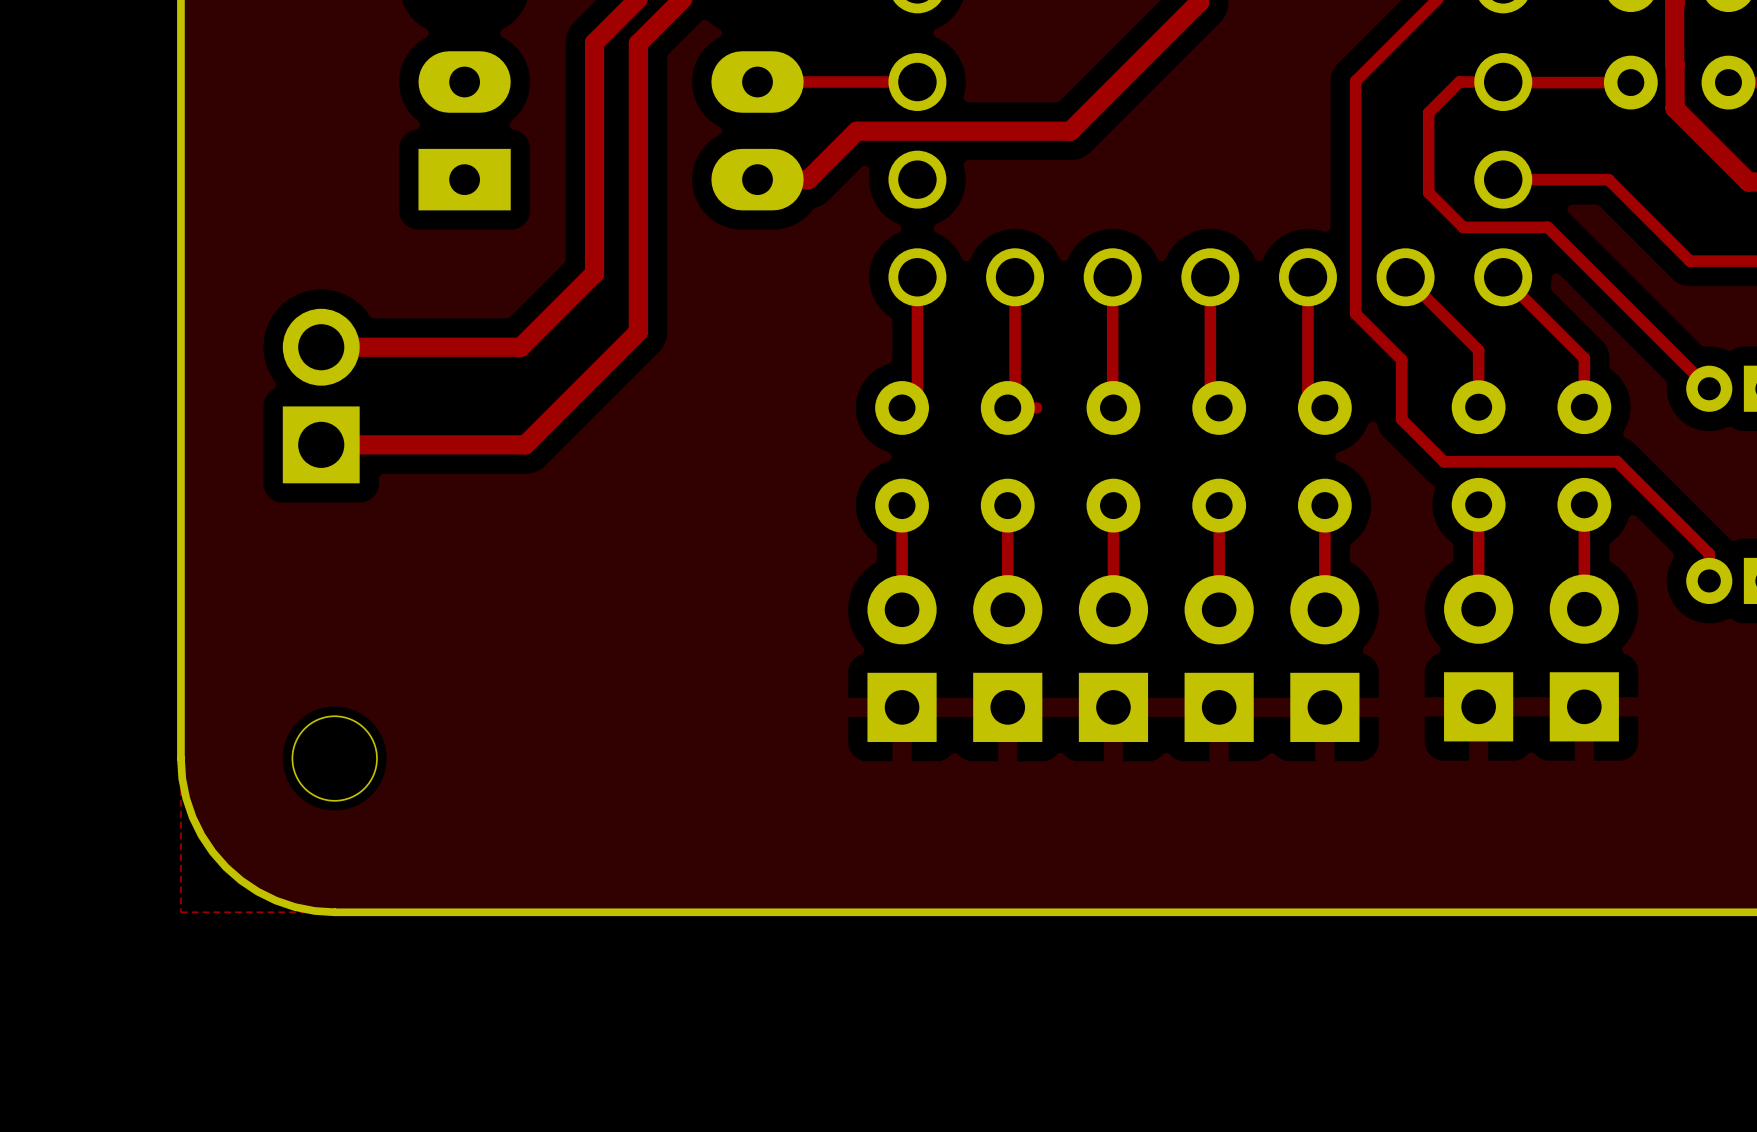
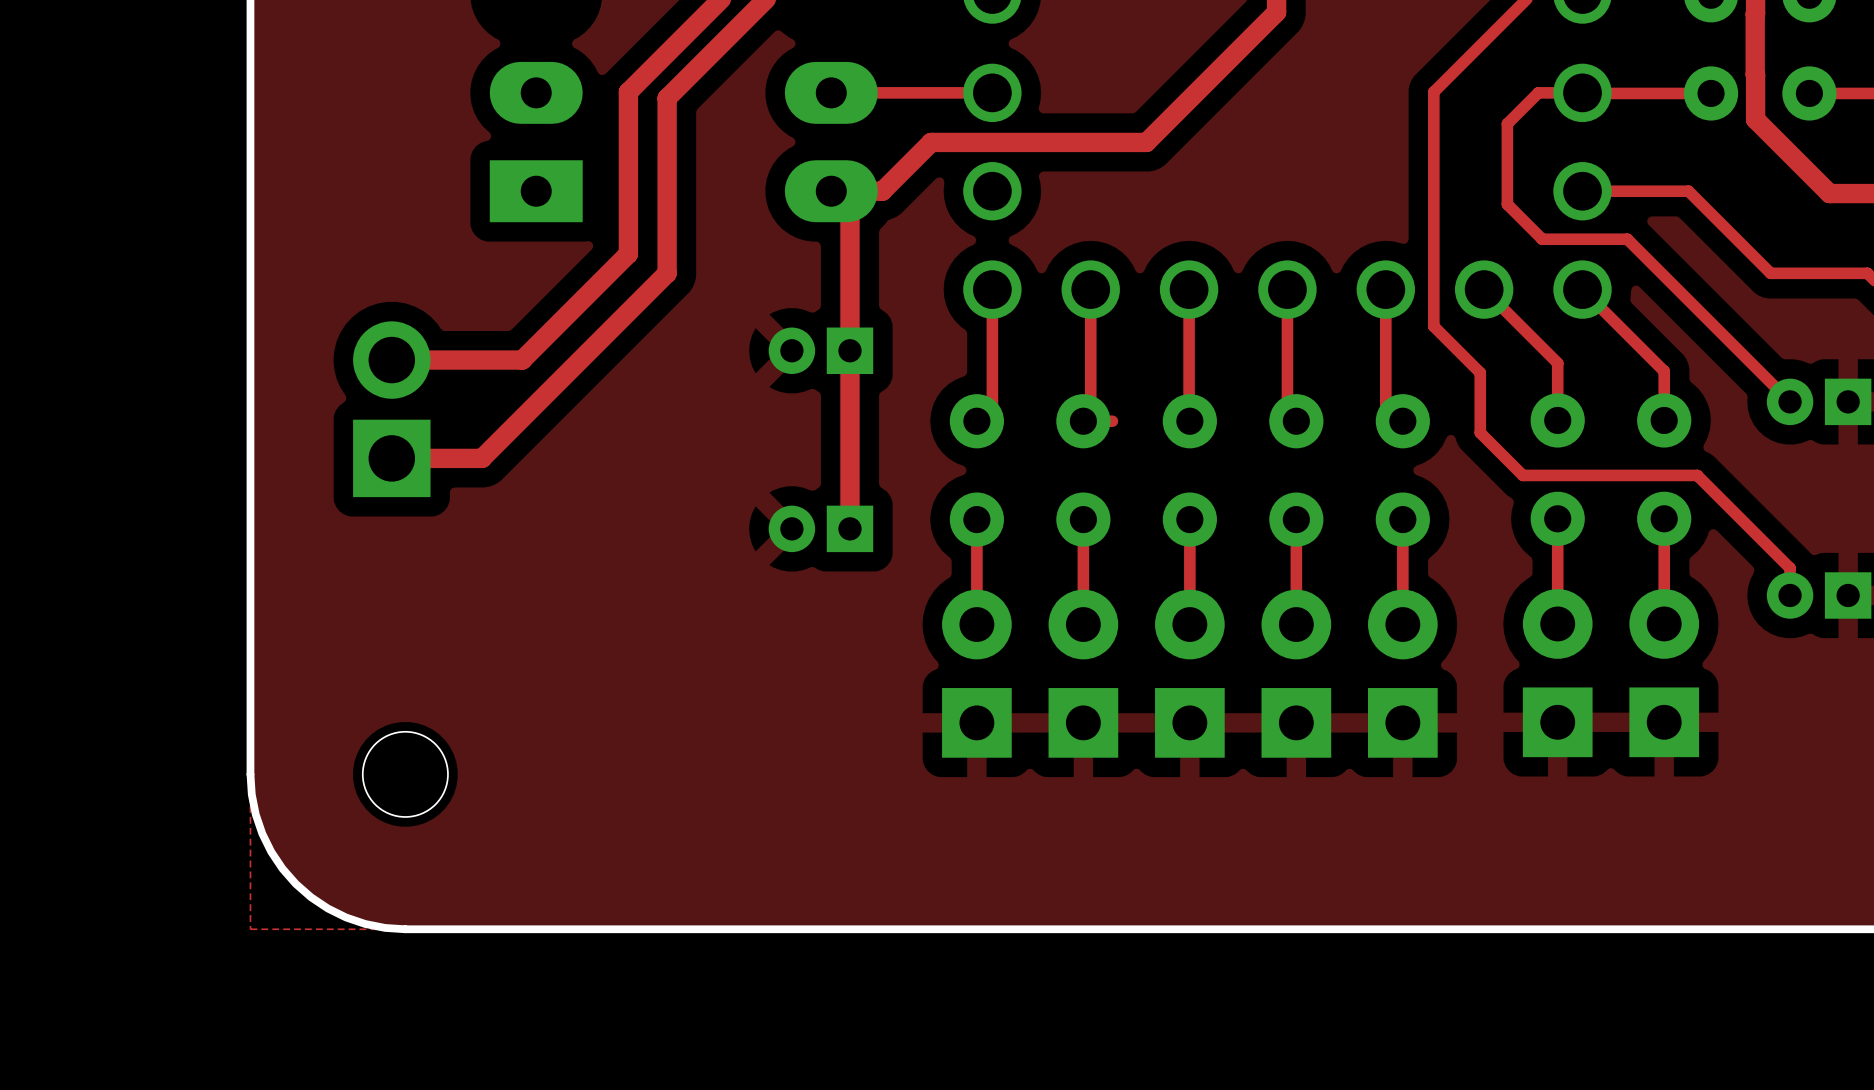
top track: (594, 42) (594, 87) -> (711, 54) (667, 98)
top track: none -> (667, 53) (628, 92) (628, 253) (522, 360)
top track: (638, 43) (638, 331) (525, 444) (410, 444) -> none
top track: none -> (831, 191) (849, 209) (849, 528)
top track: (594, 261) (594, 273) (520, 347) (450, 347) -> (667, 273) (482, 458)
part: none -> (820, 350)
part: none -> (820, 528)

